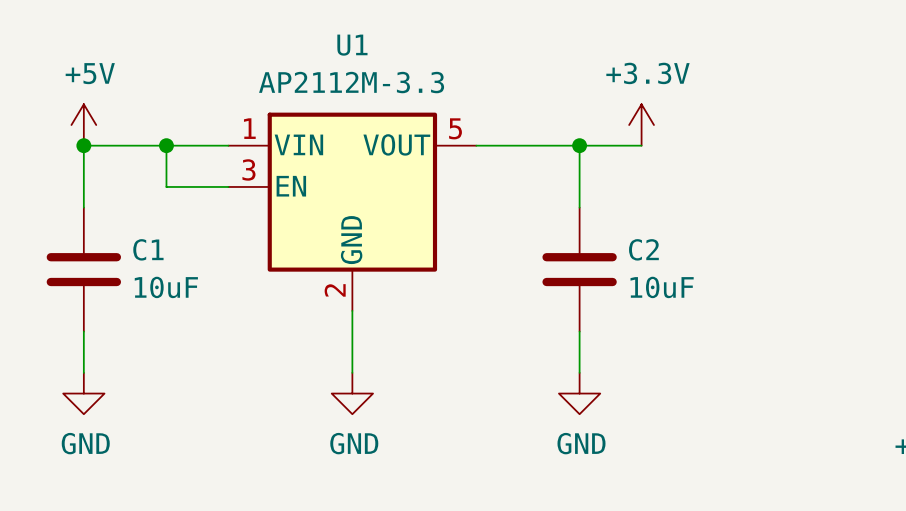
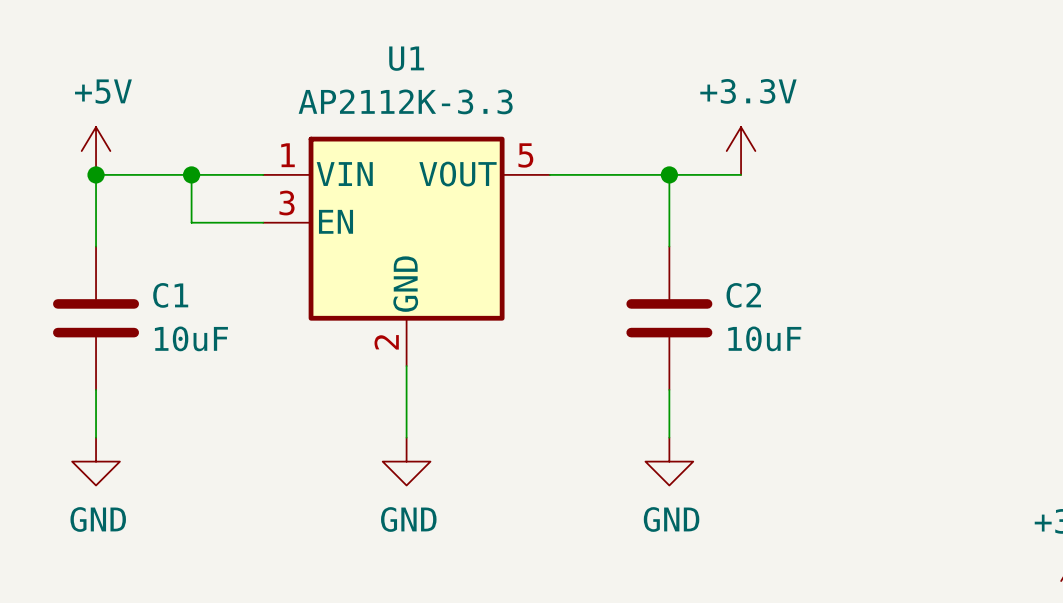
U1 value: AP2112M-3.3 (351, 82) -> AP2112K-3.3 (405, 101)

